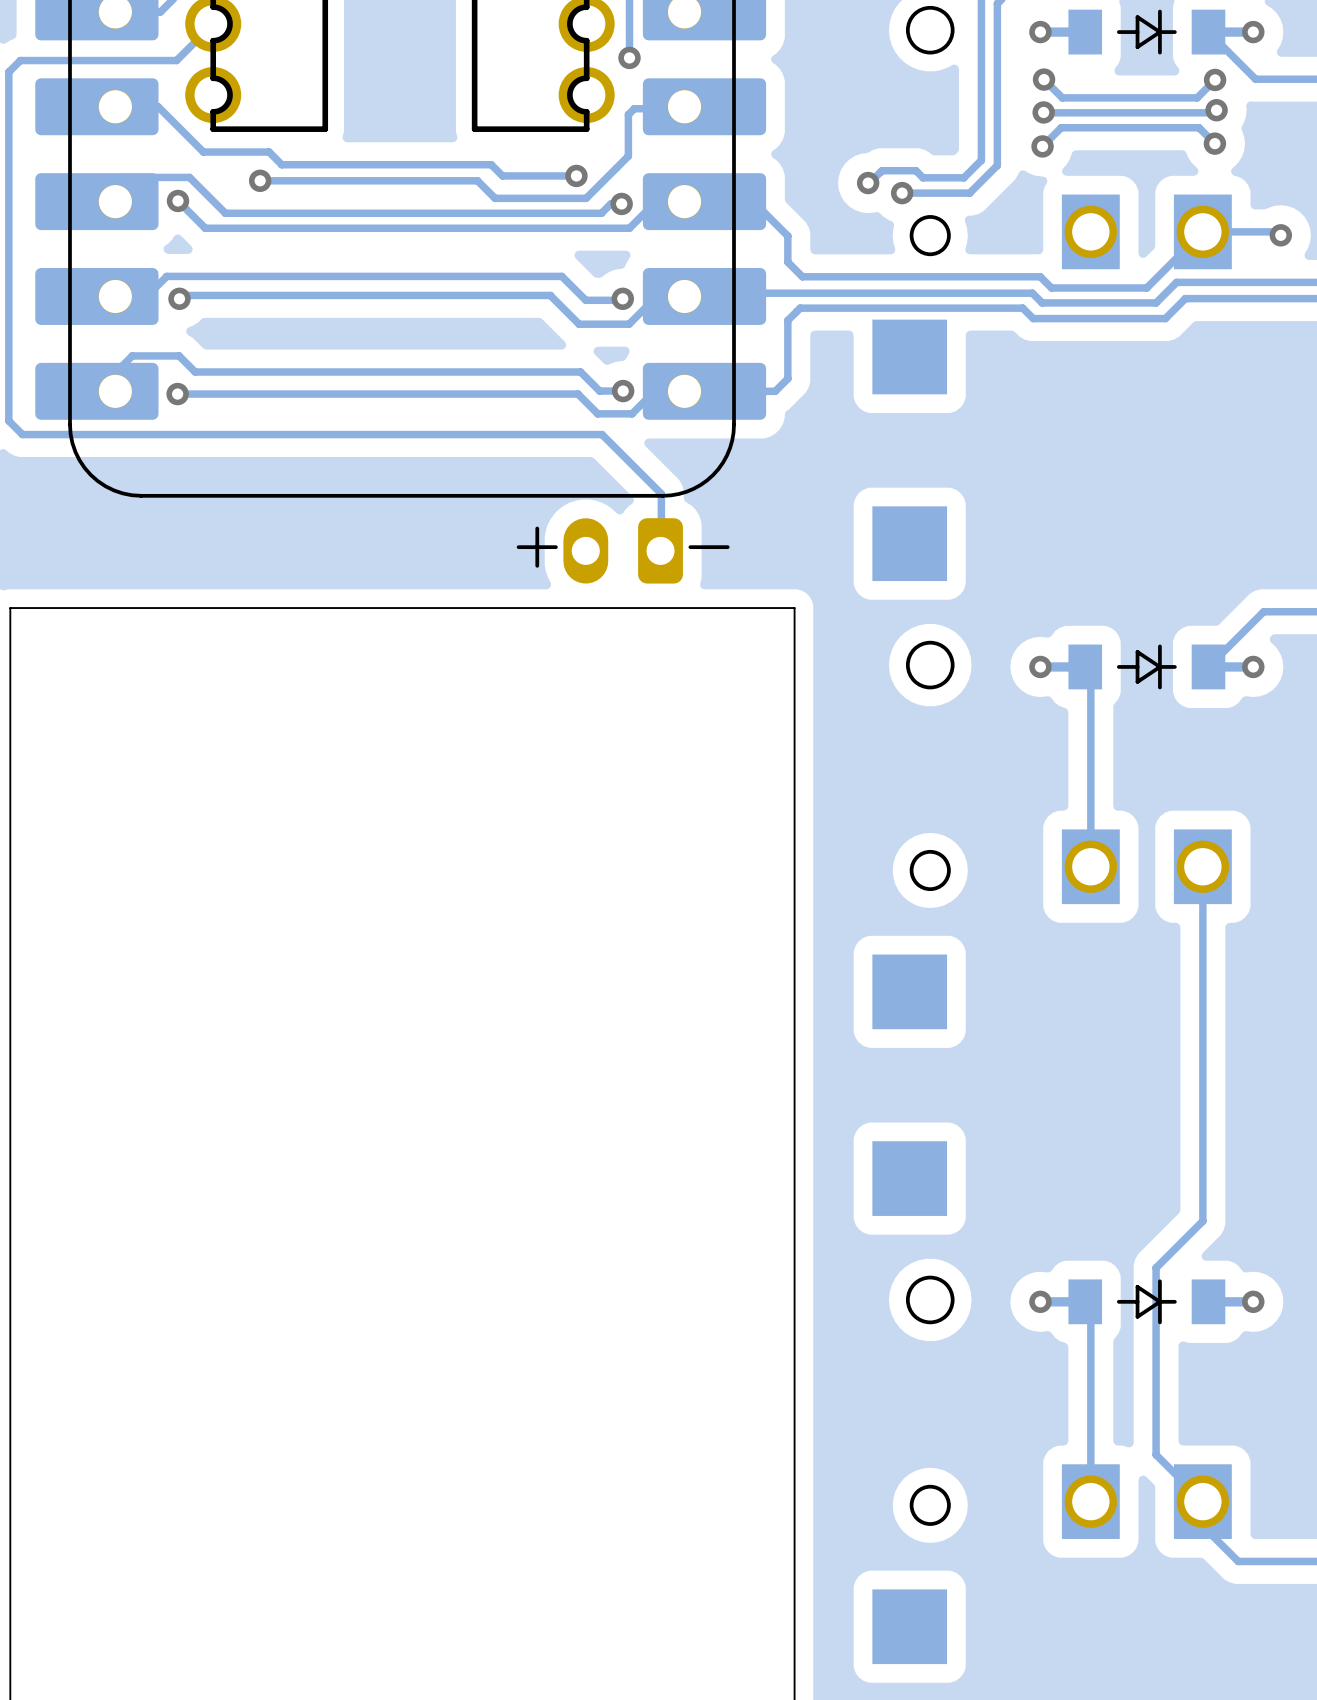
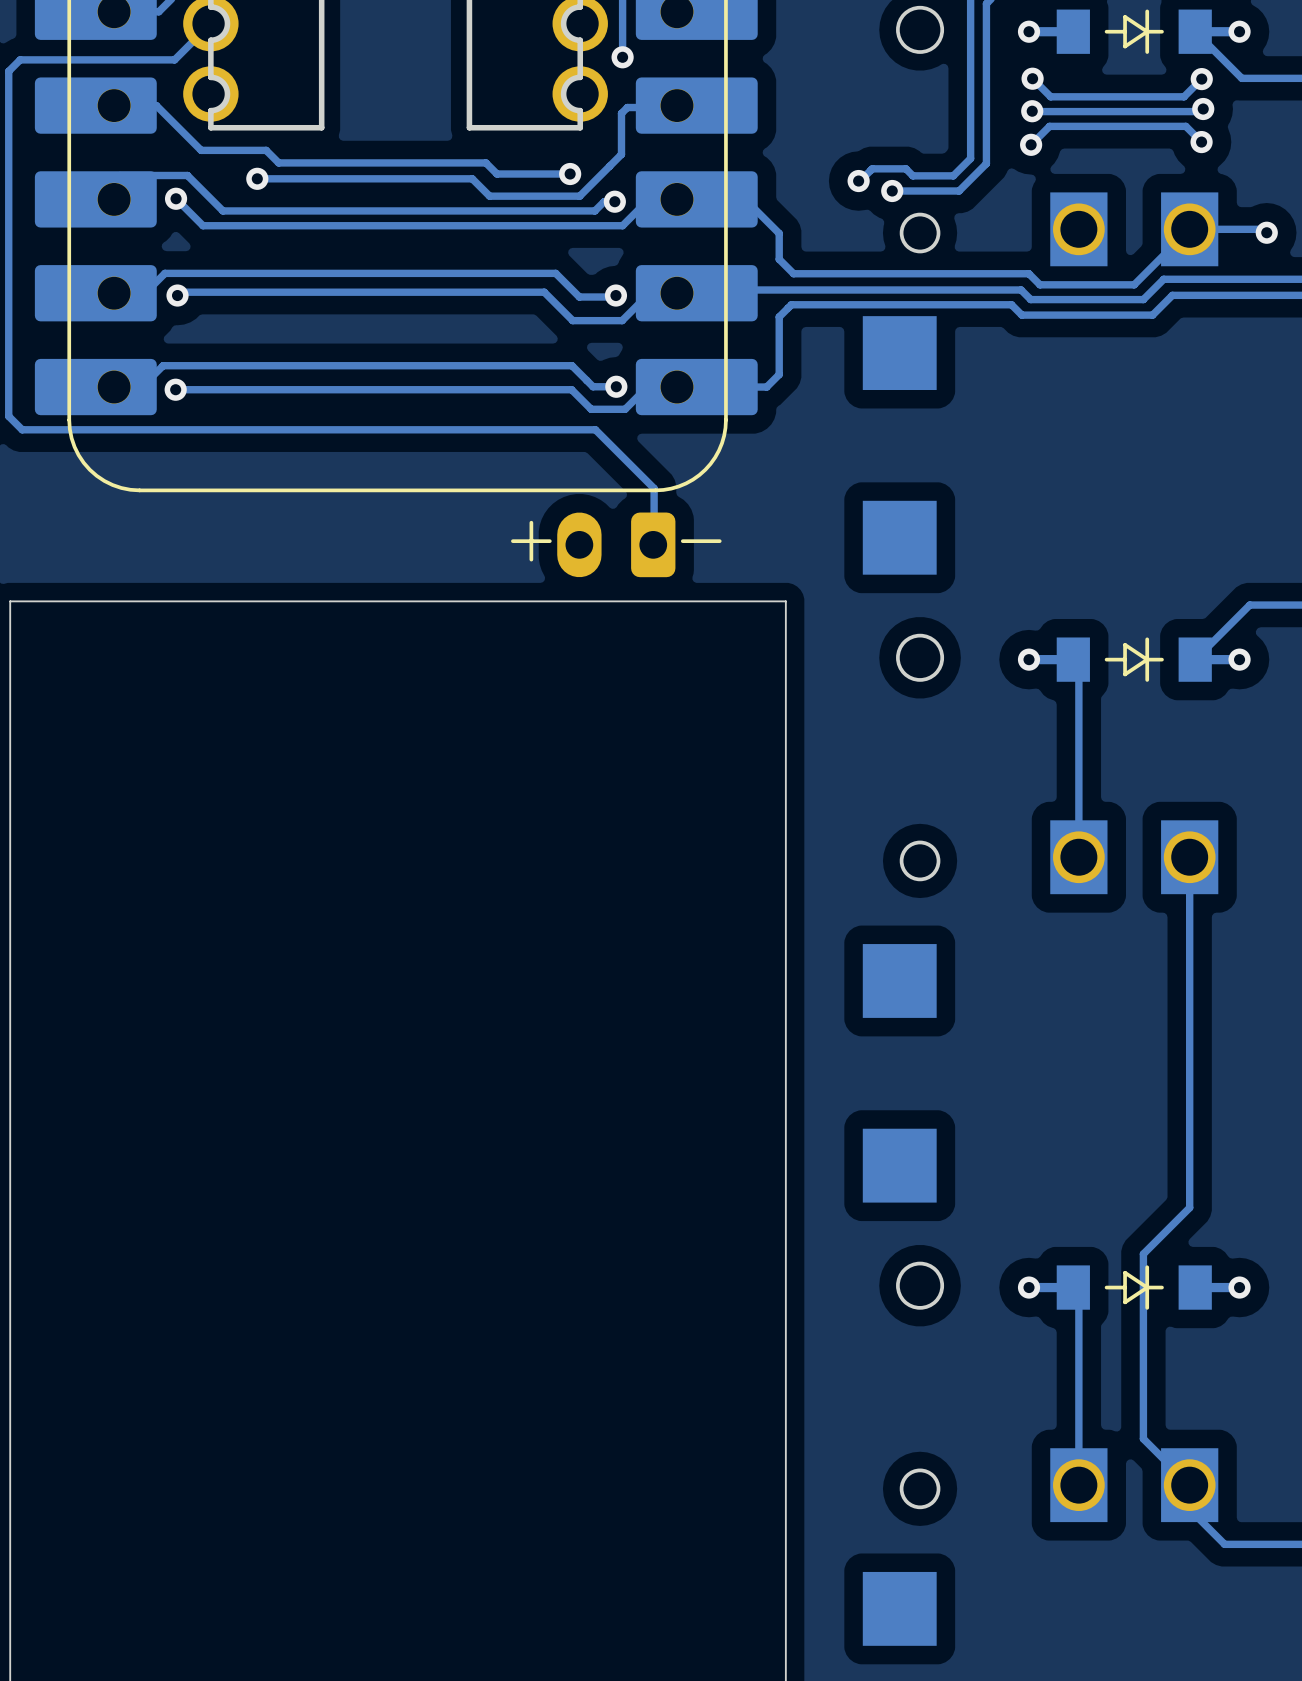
track: (580, 372) (195, 372) (179, 355) (132, 355) (96, 391) -> (574, 367) (572, 365) (163, 365) (141, 387) (95, 387)

